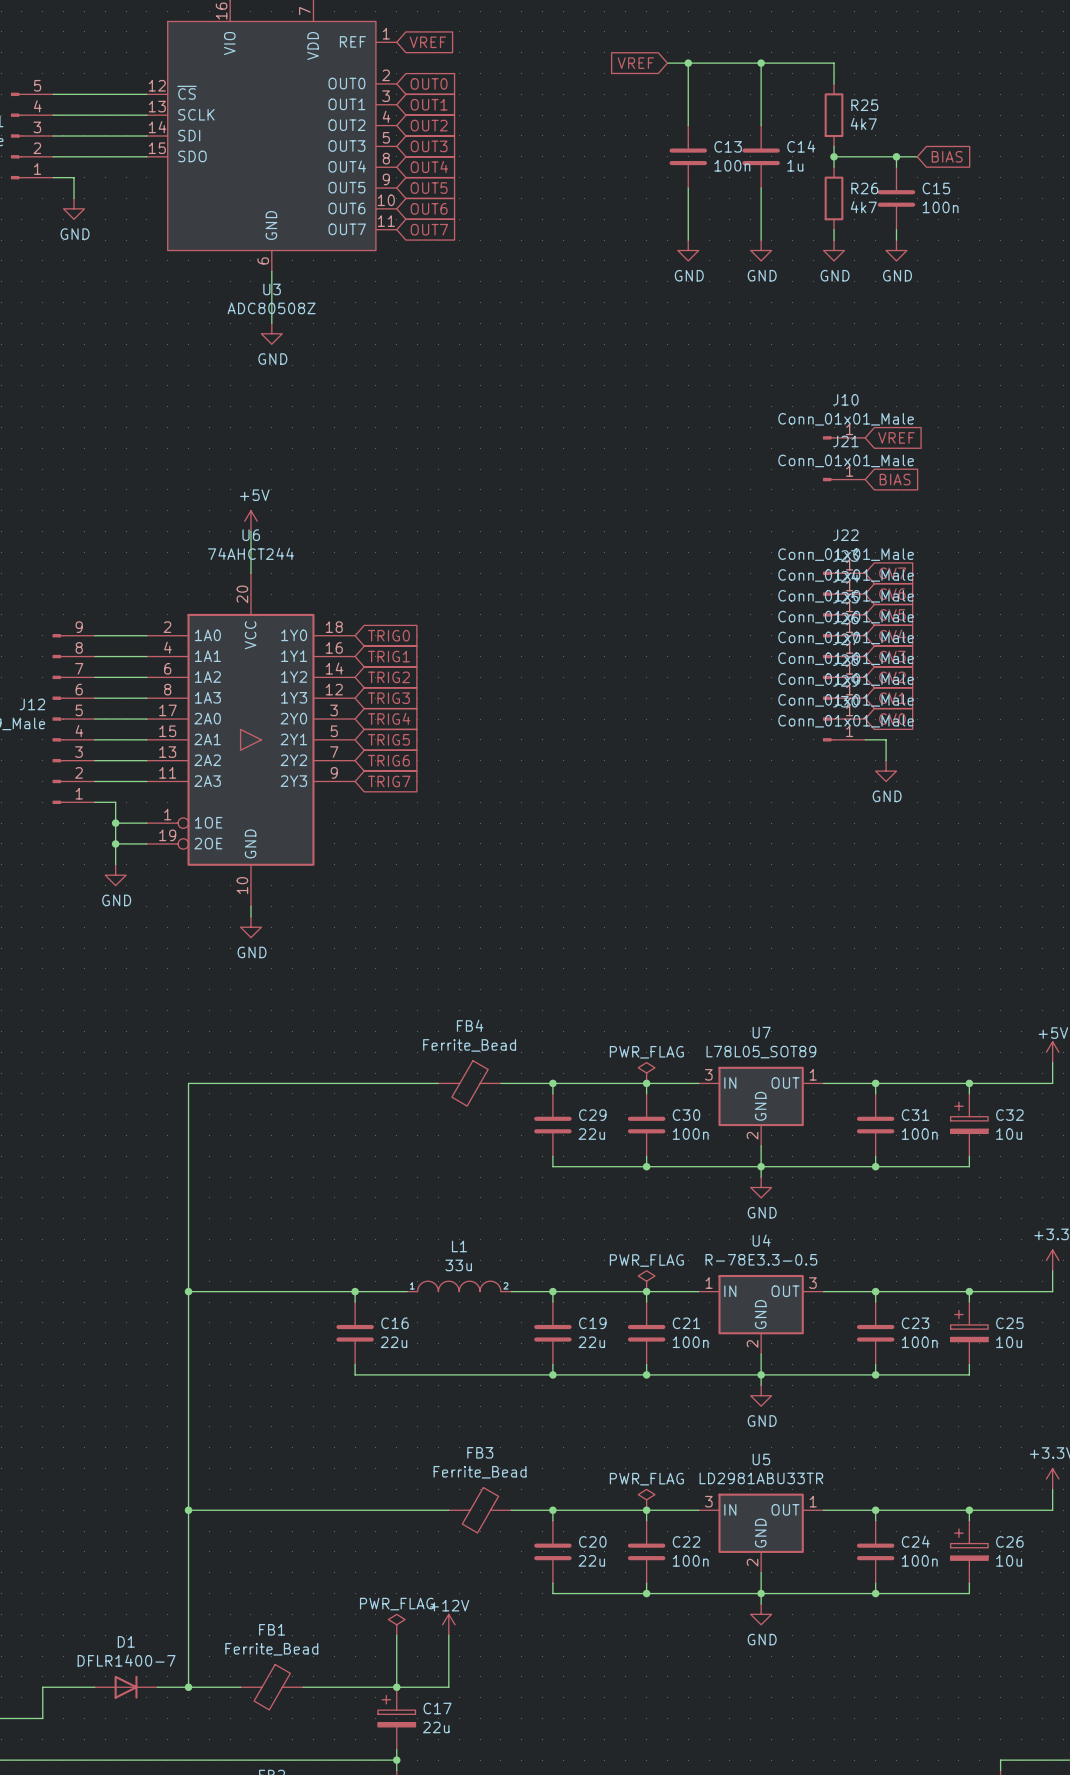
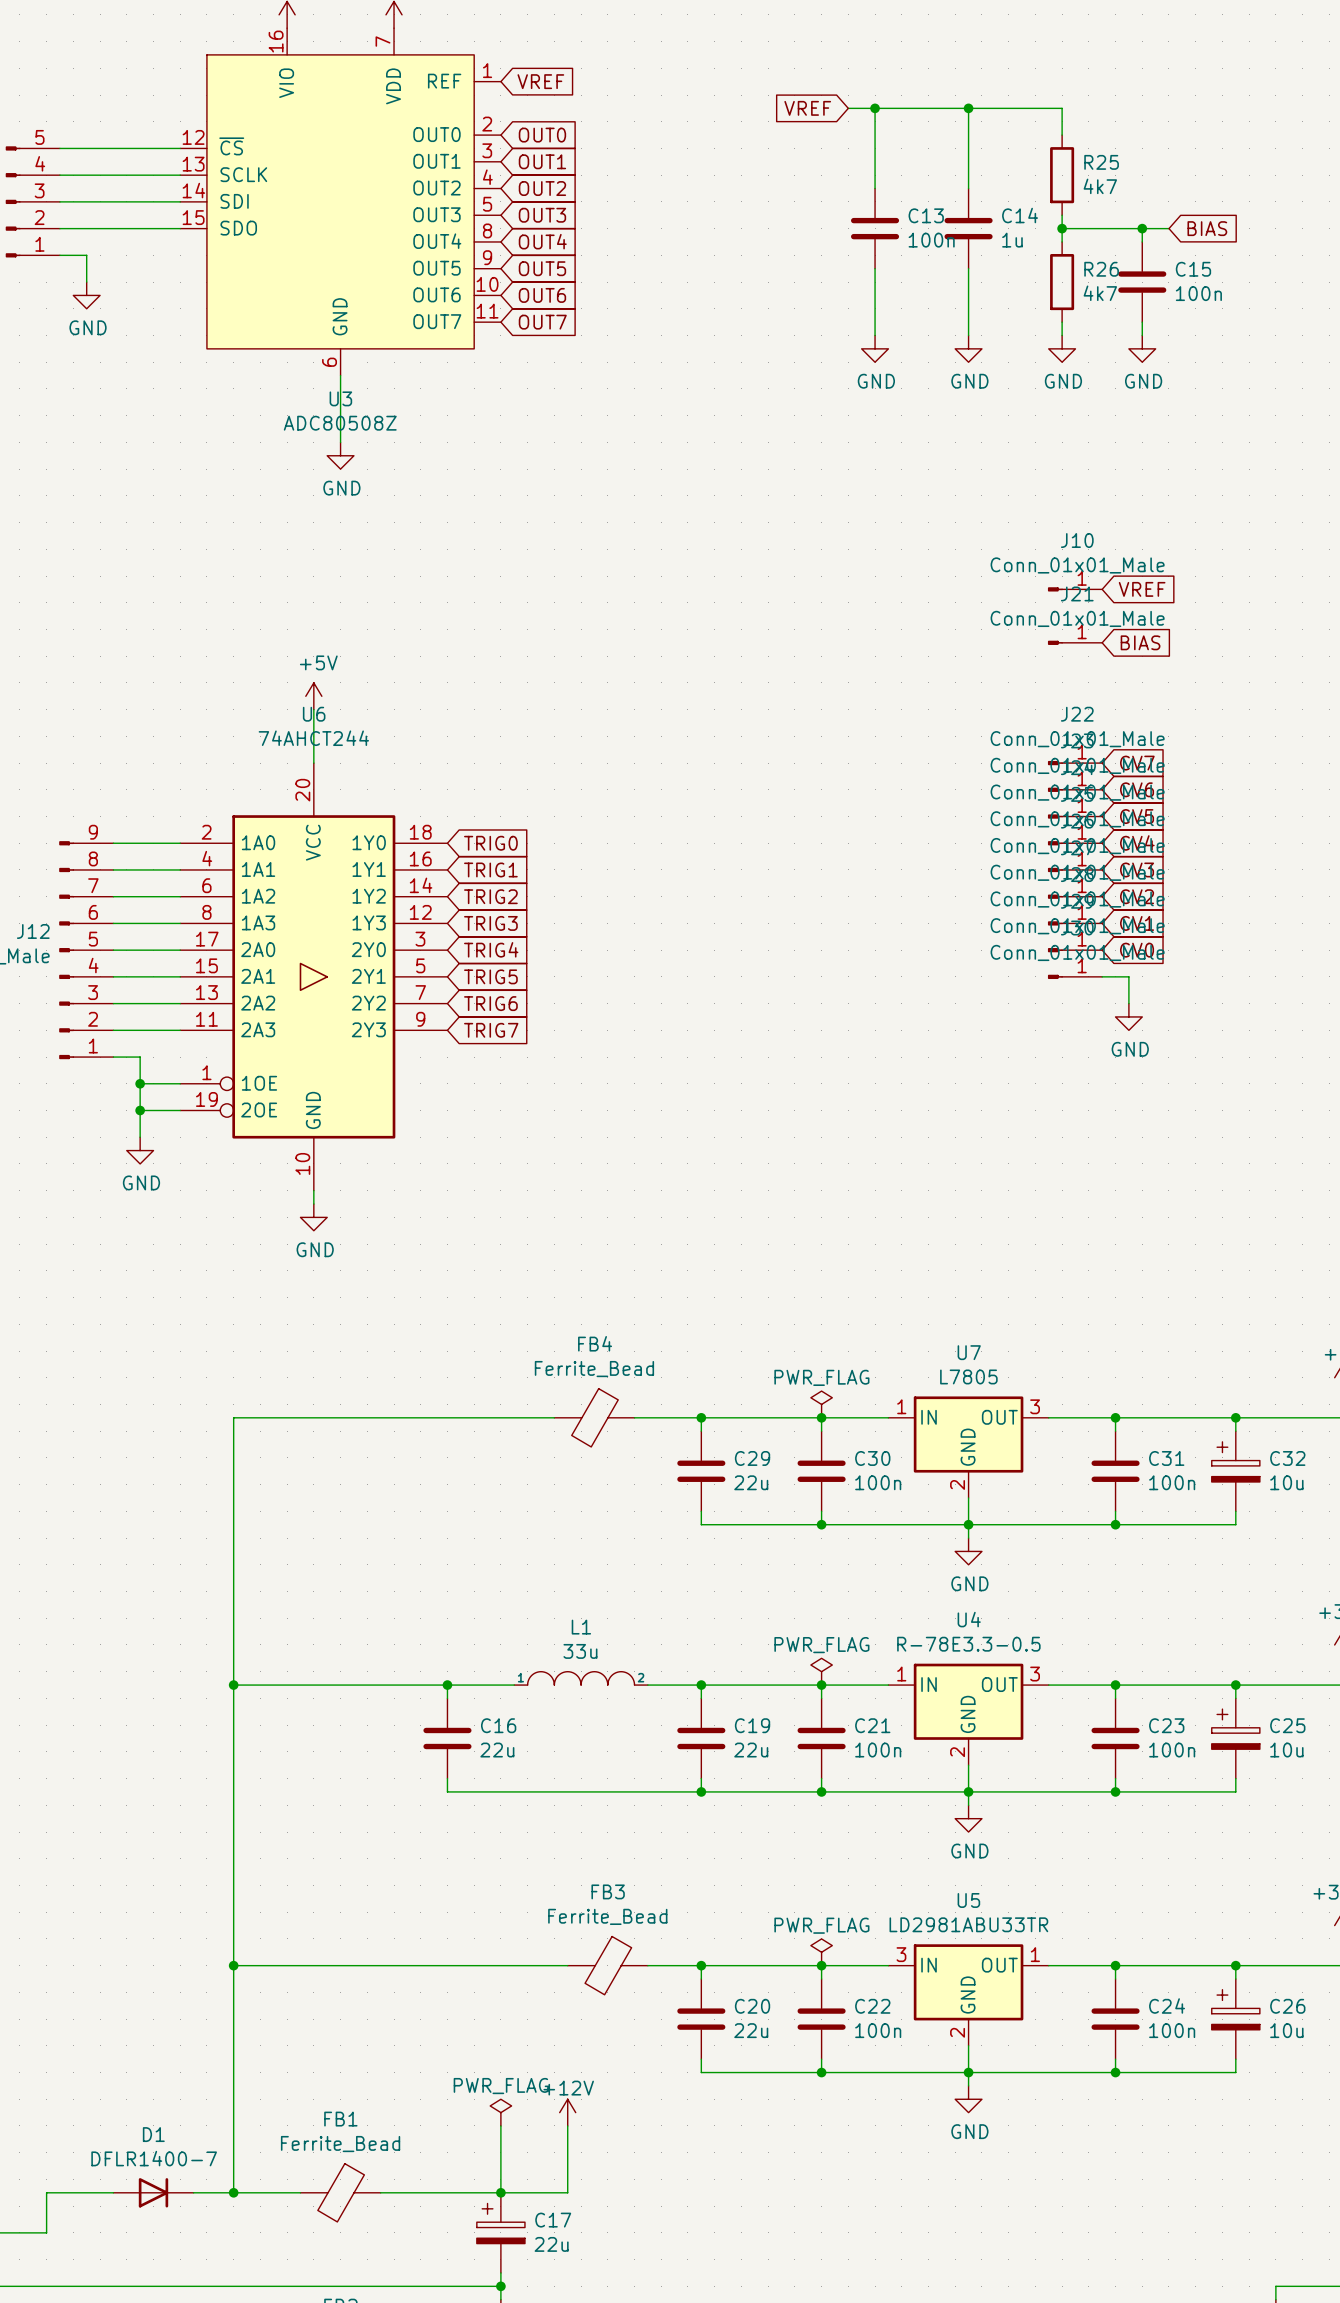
U7 value: L78L05_SOT89 (761, 1052) -> L7805 (968, 1376)
U7 pin number: 3 (708, 1074) -> 1 (901, 1406)
U7 pin number: 1 (813, 1074) -> 3 (1035, 1406)

